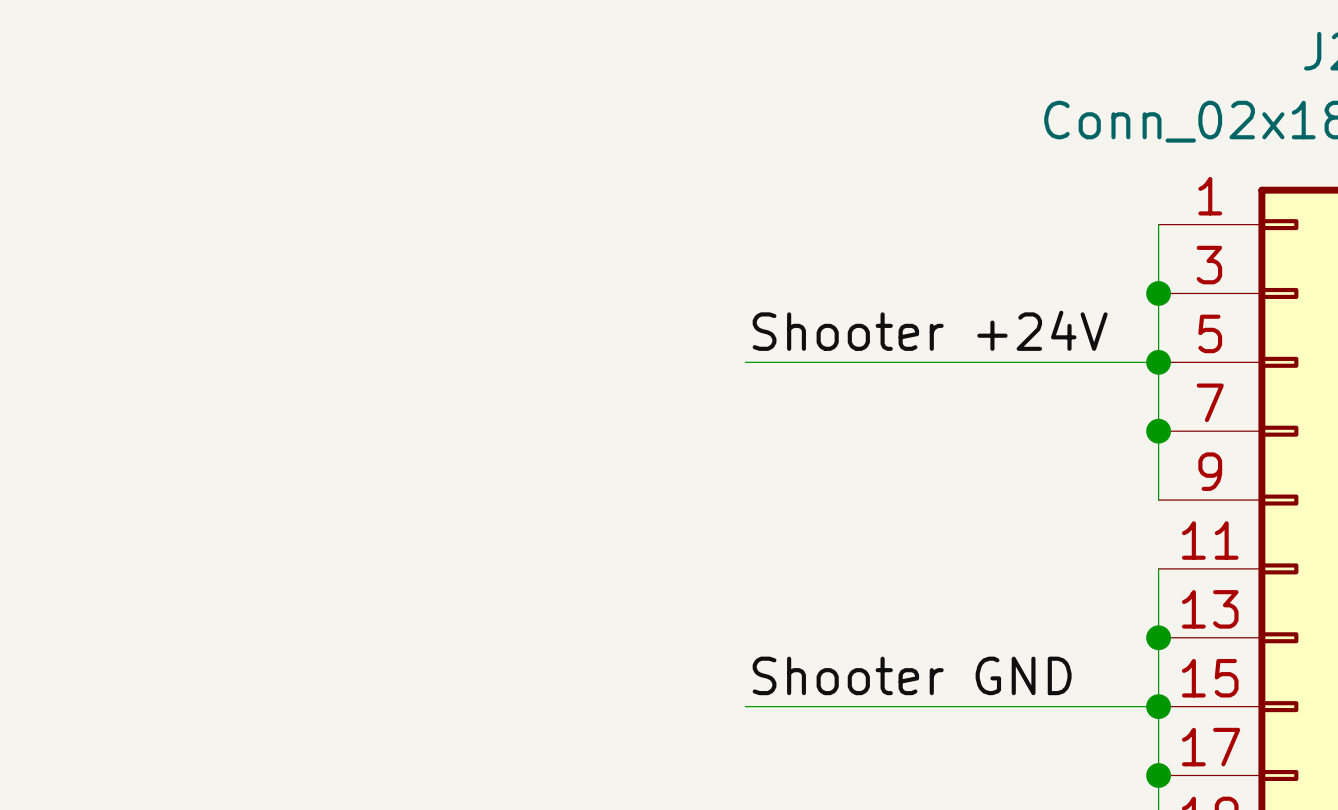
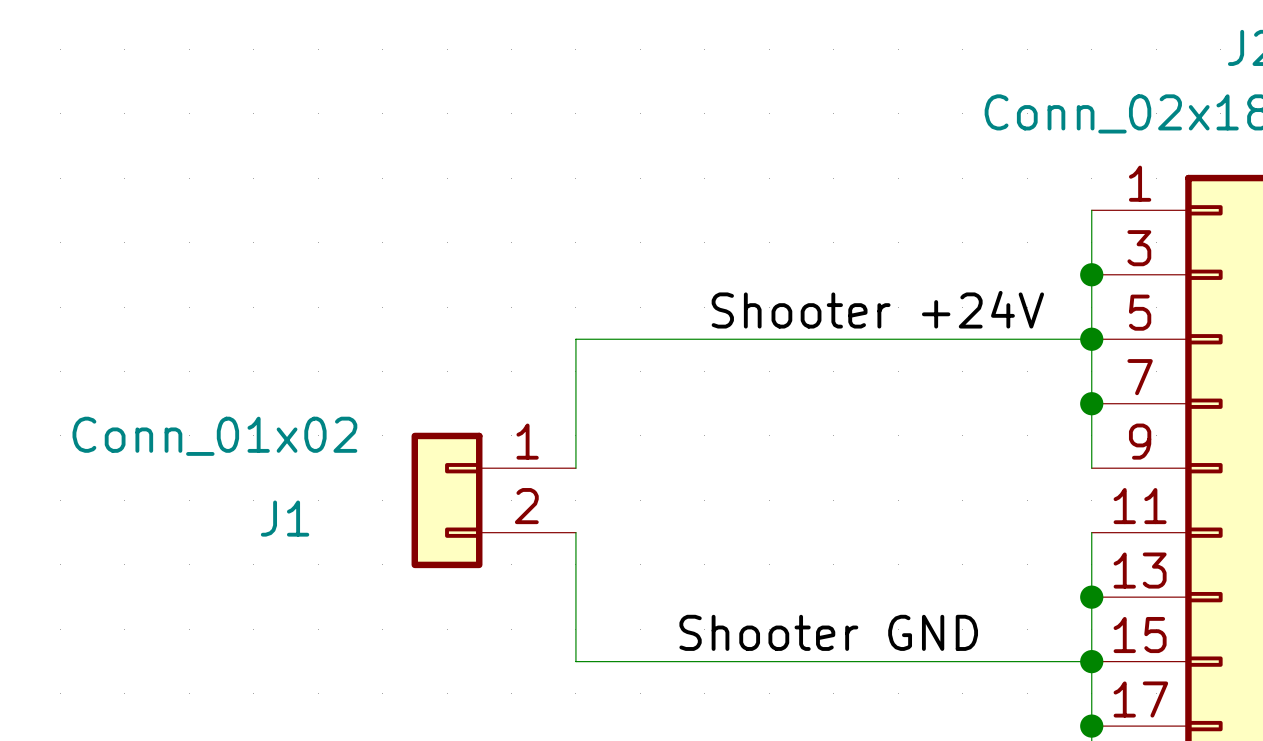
wire: none -> (704, 339) (575, 339) (575, 468)
J1: none -> Conn_01x02 (493, 500)
wire: none -> (575, 532) (575, 661) (704, 661)
label position: Shooter GND (912, 675) -> Shooter GND (828, 632)

